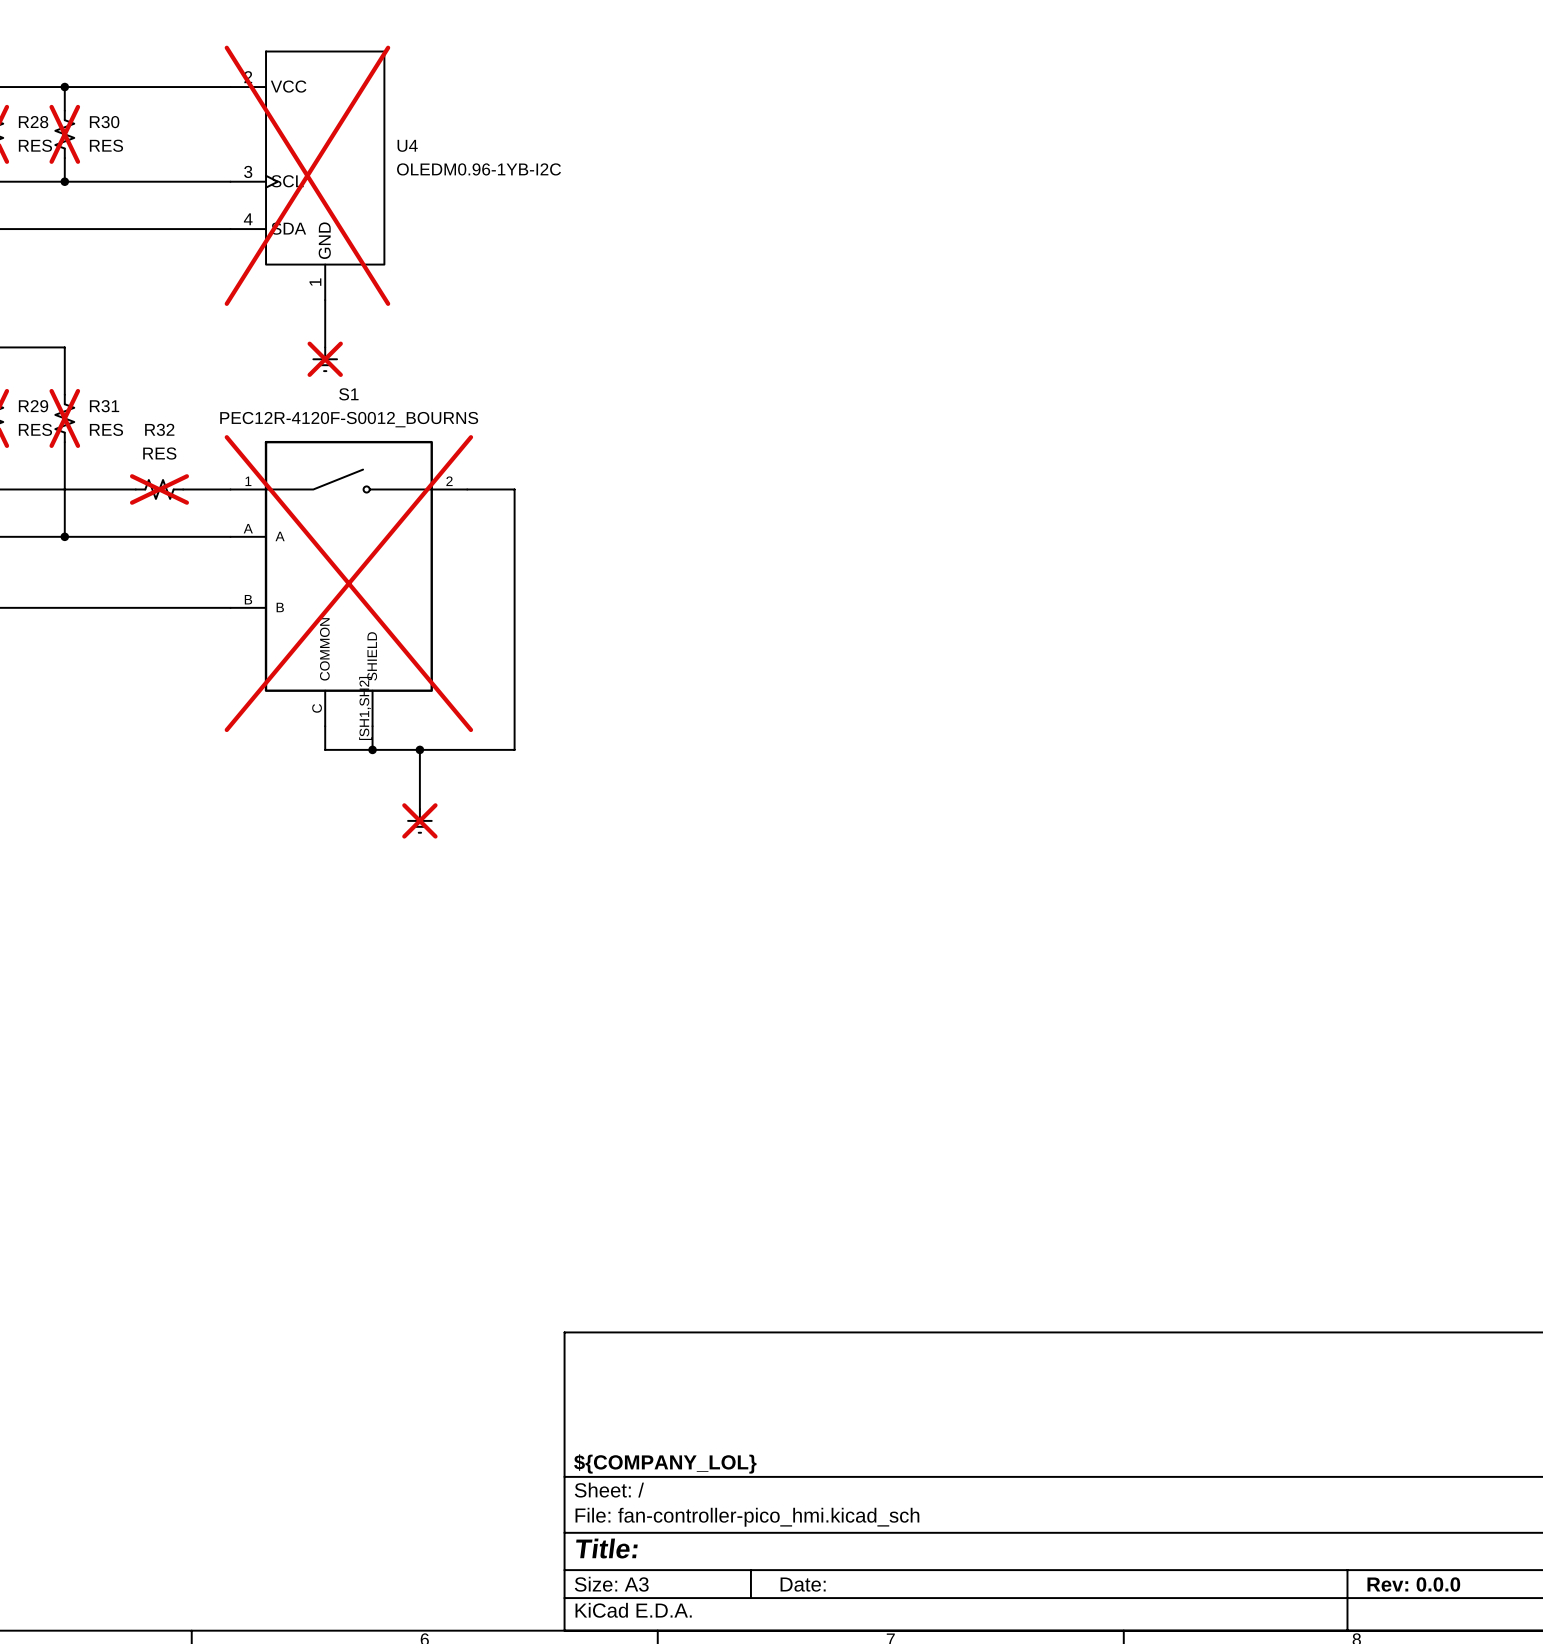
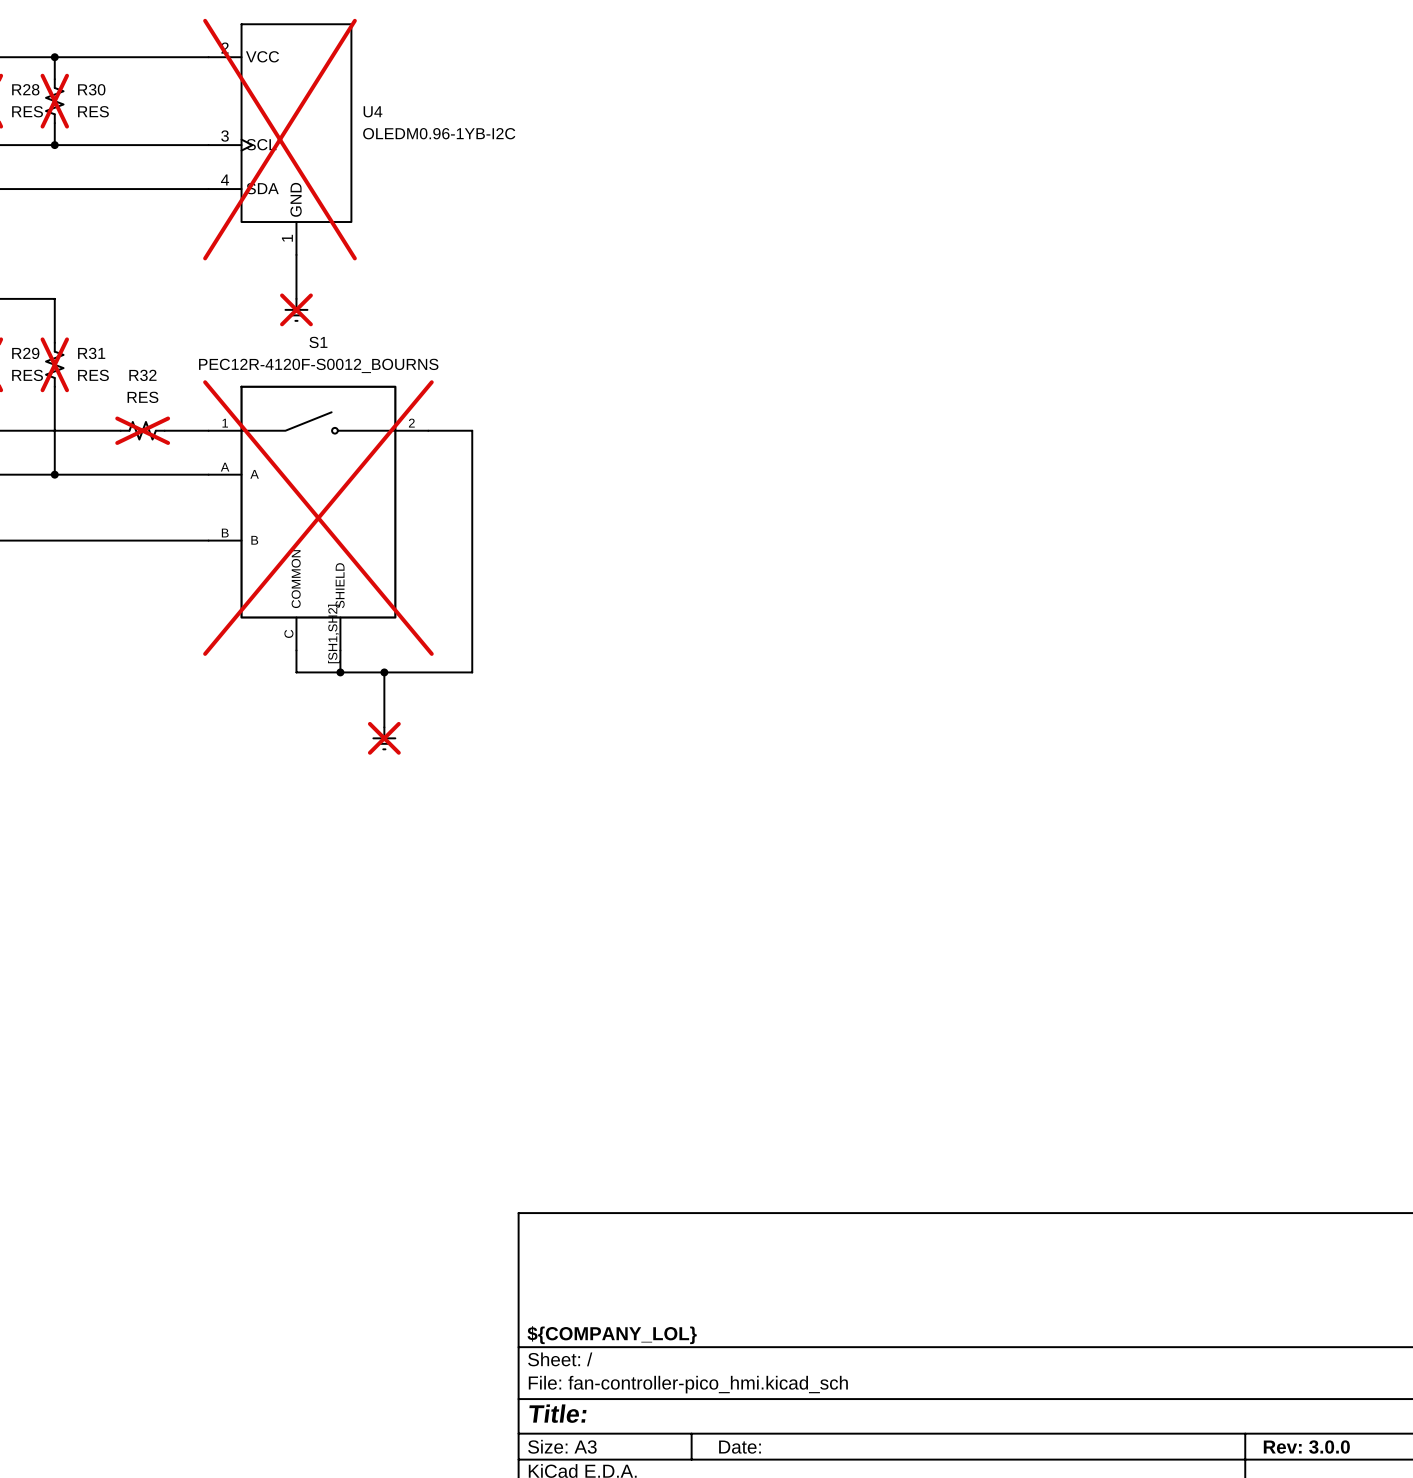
title block: Rev: 0.0.0 (1413, 1584) -> Rev: 3.0.0 (1306, 1447)

